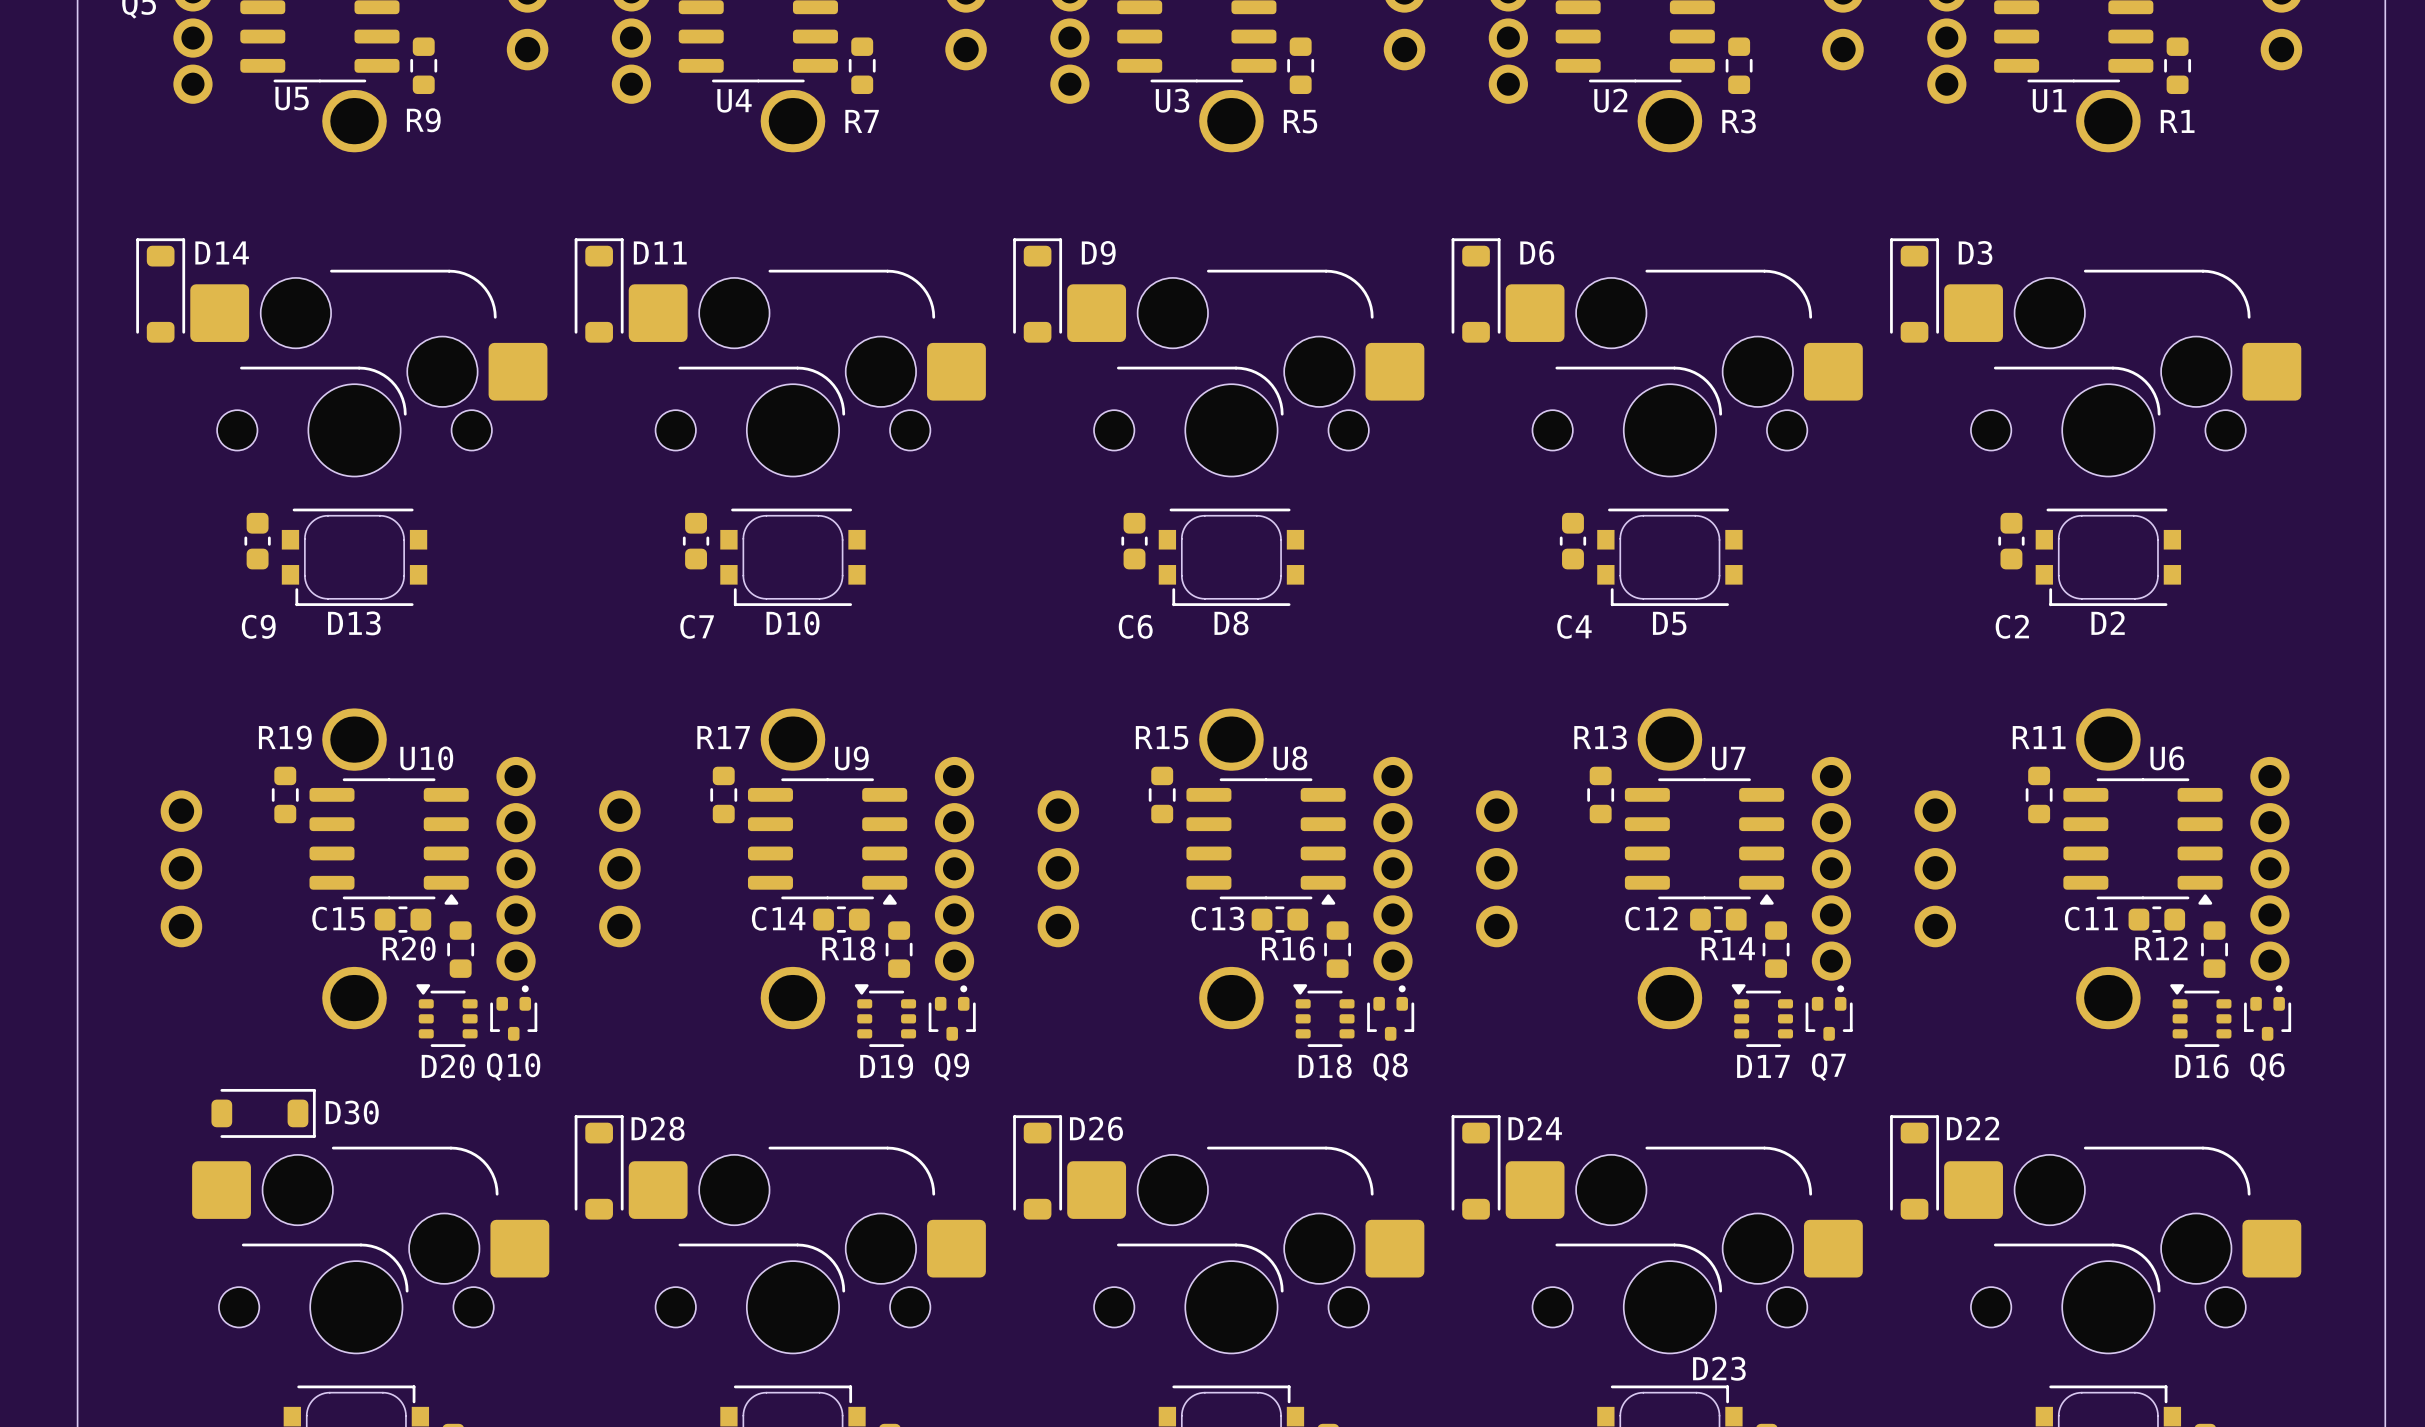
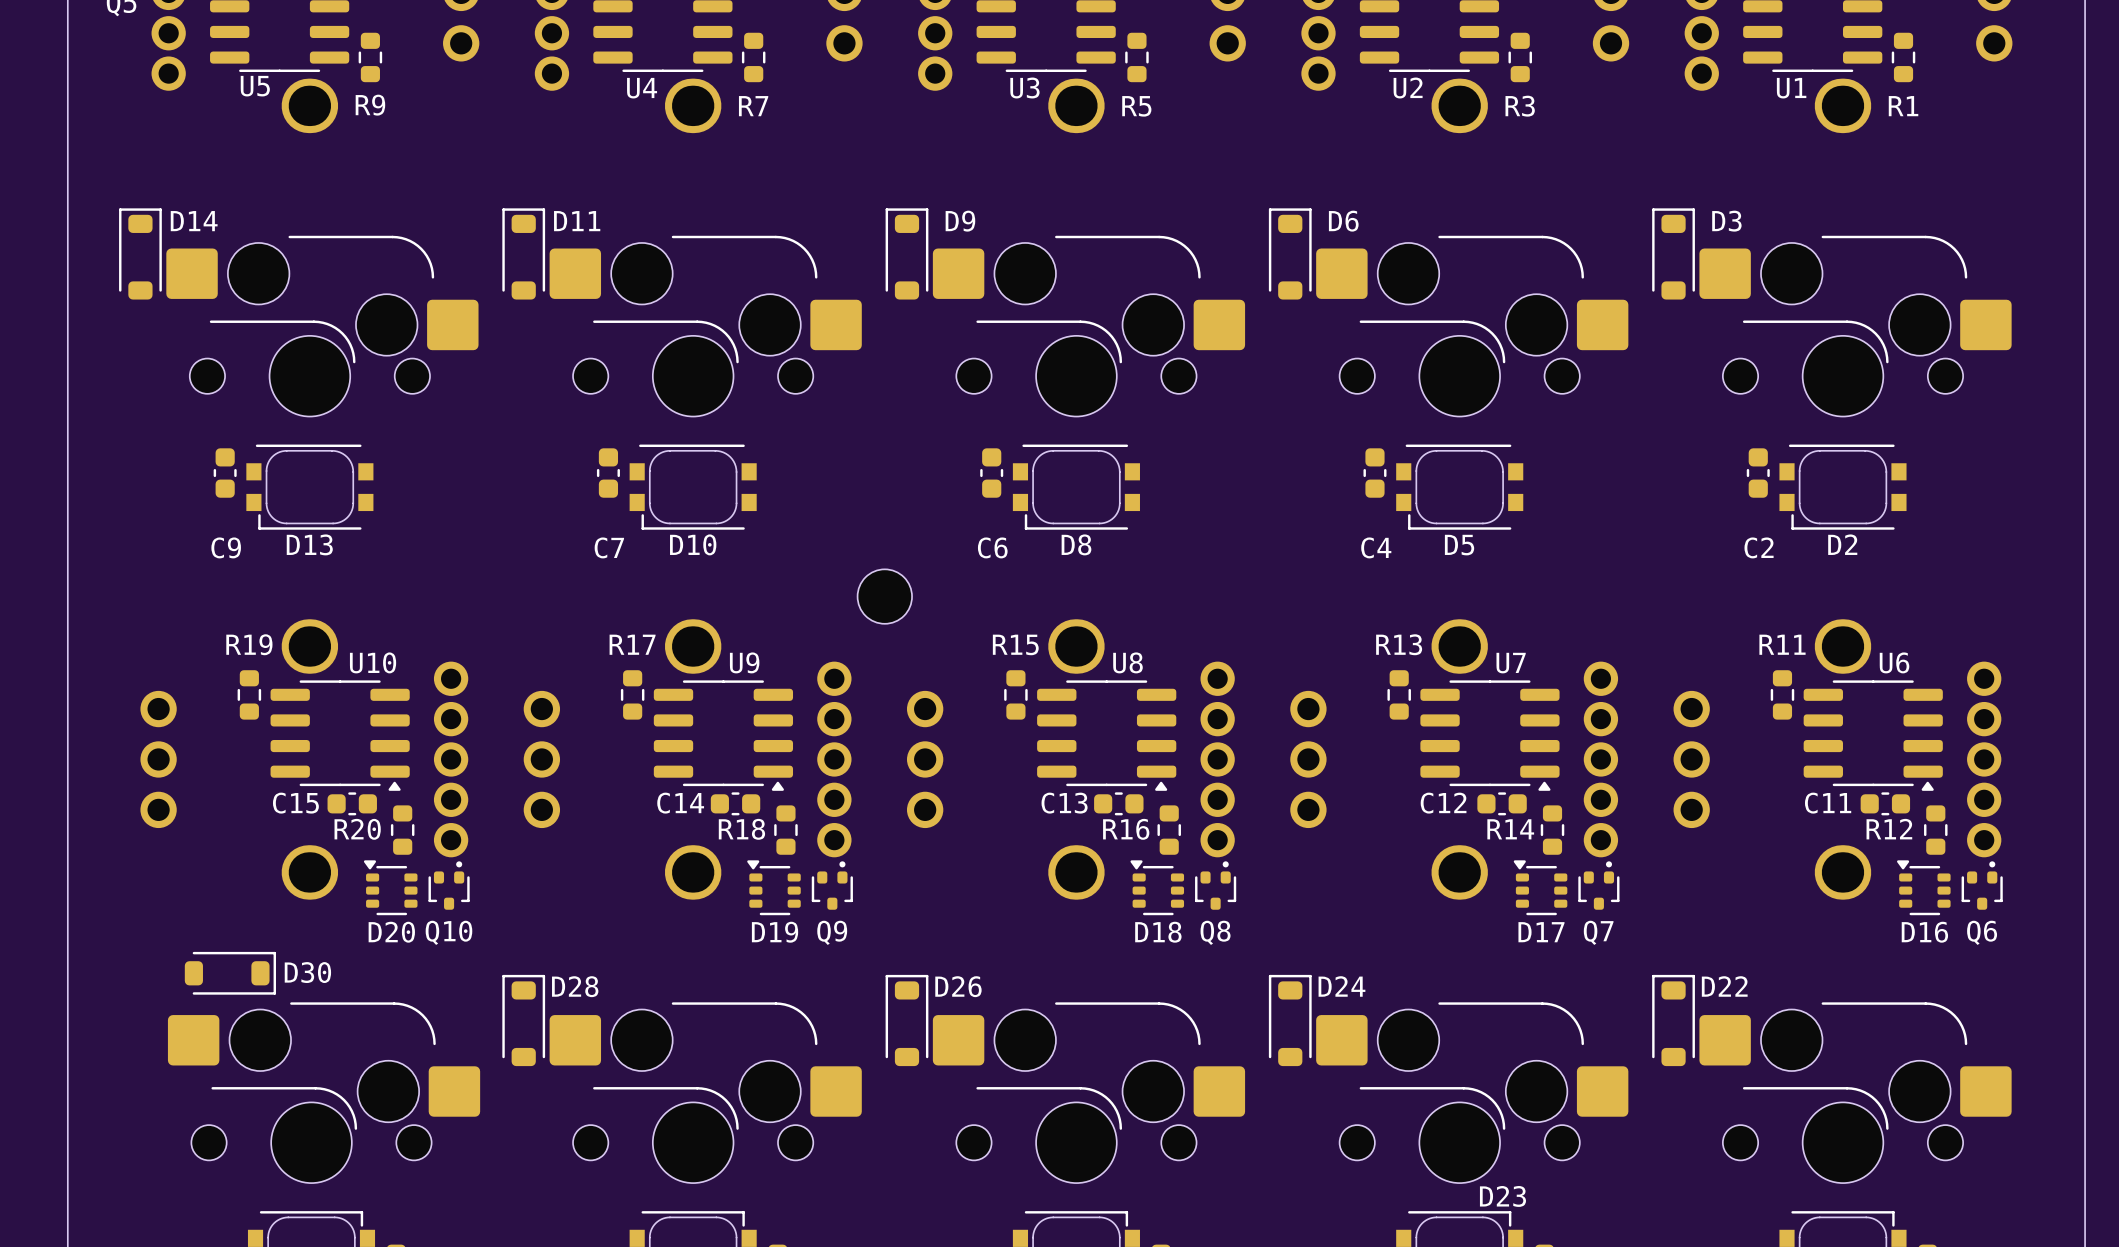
part: none -> (884, 596)

